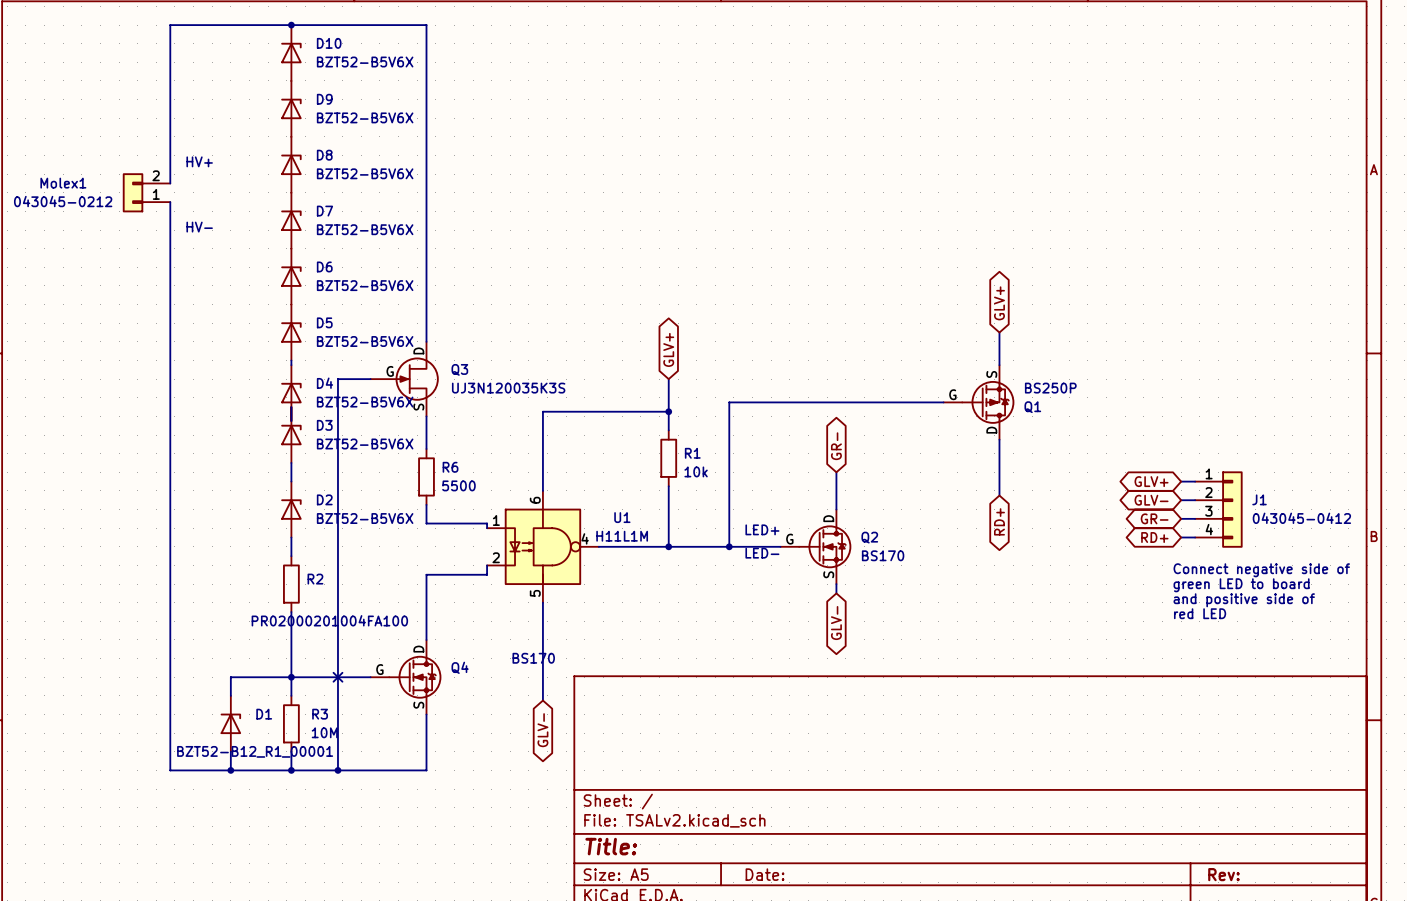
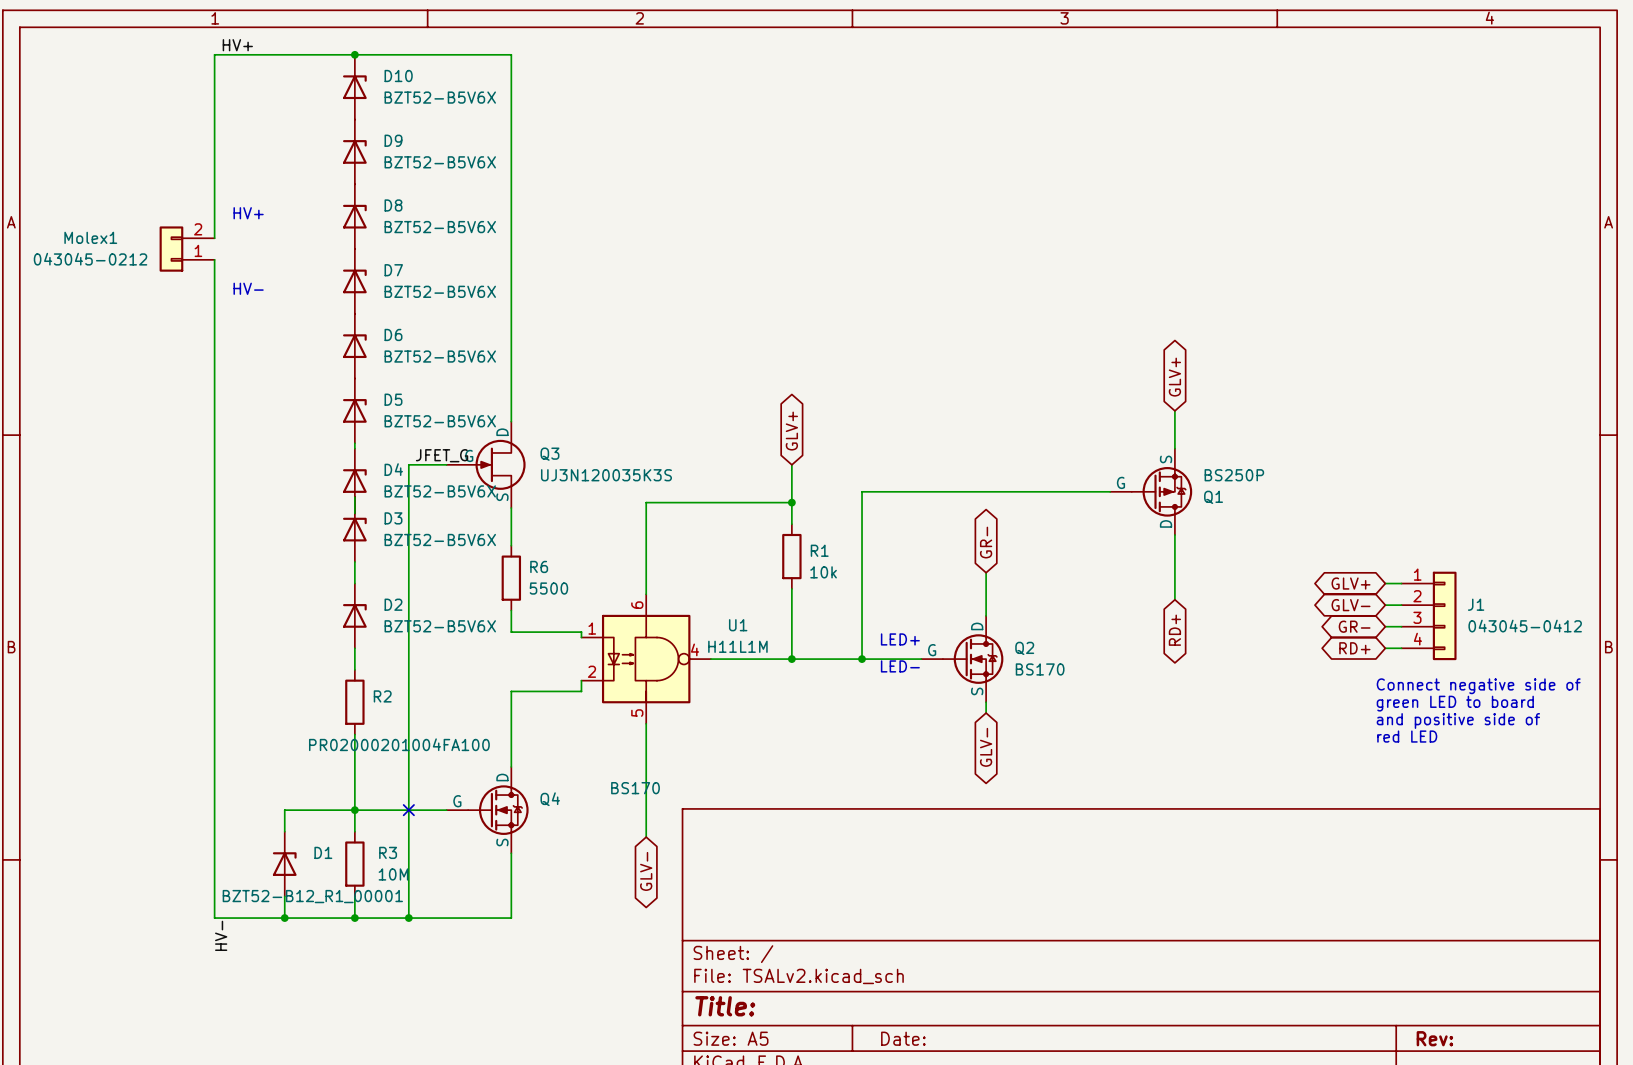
label: none -> HV+ (237, 45)
label: none -> JFET_G (442, 455)
label: none -> HV- (221, 935)

